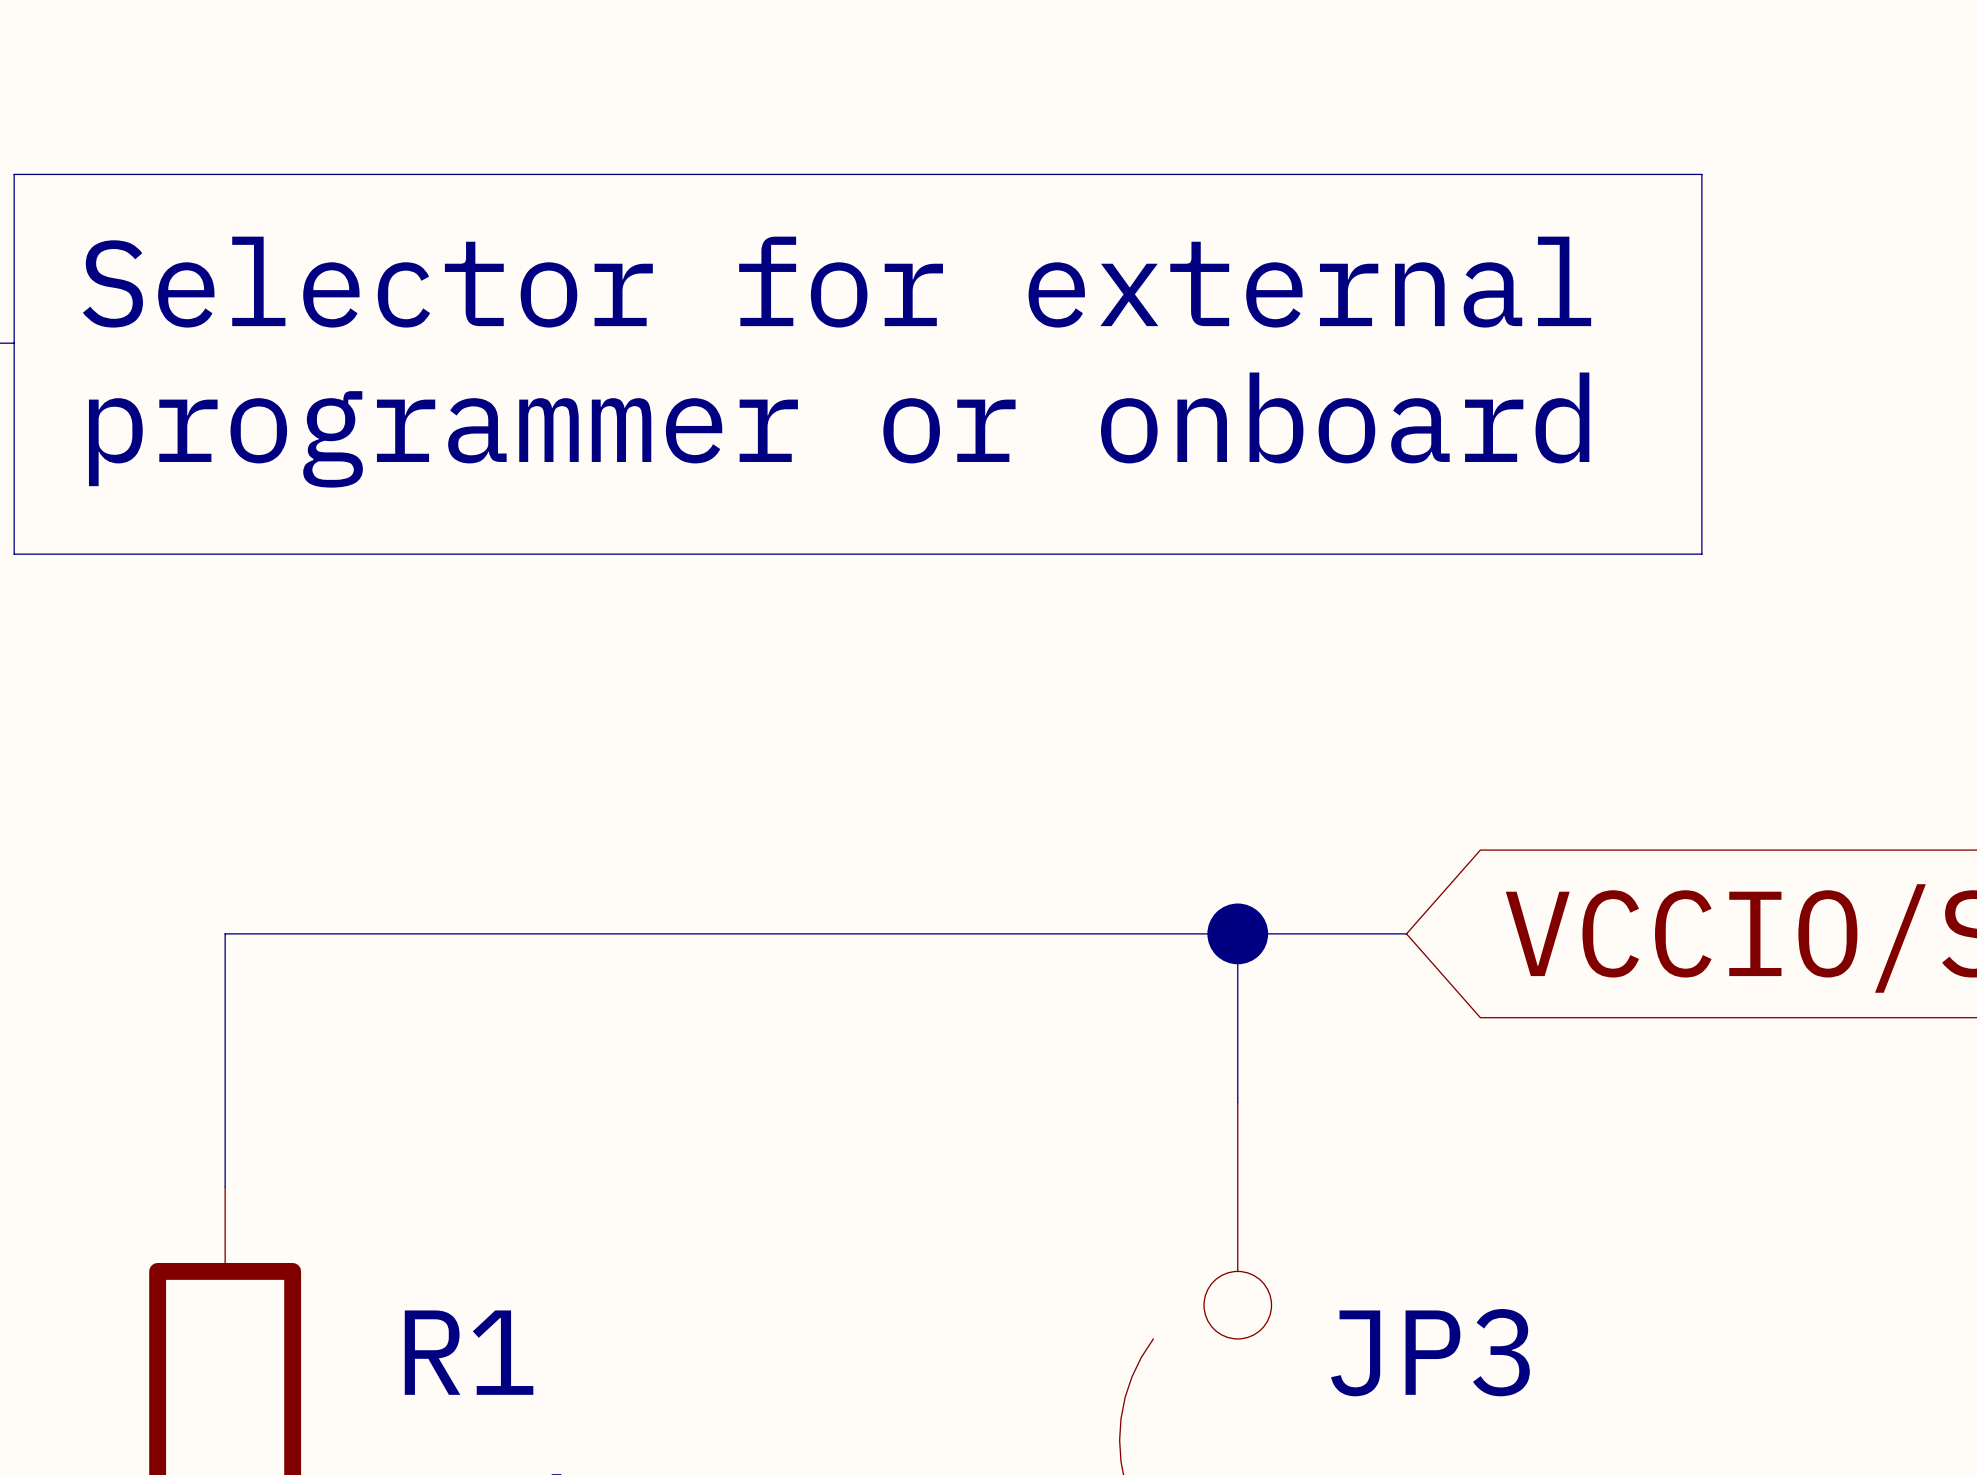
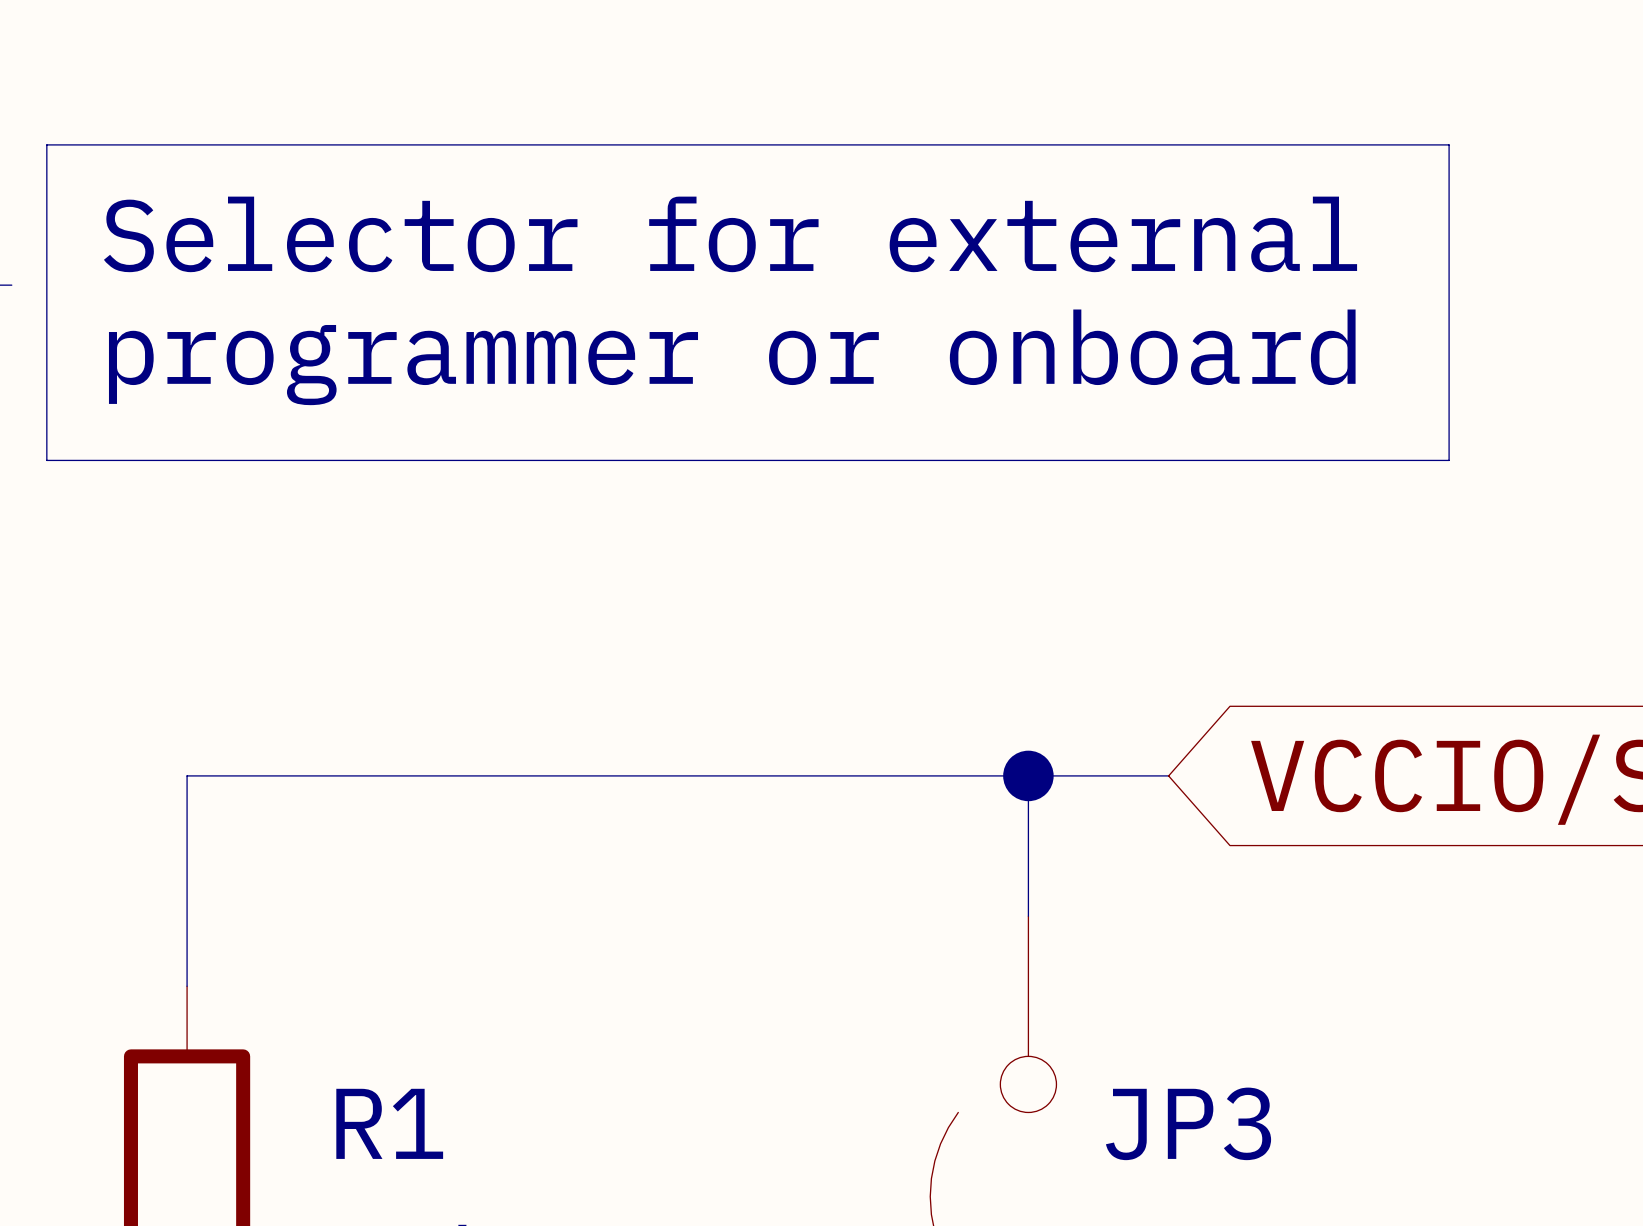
line: (56, 174) (14, 174) (14, 554) (56, 554) -> (46, 144) (46, 460)
line: (1701, 174) (1701, 554) -> (1414, 144) (1449, 144) (1449, 460) (1414, 460)
text position: Selector for external (837, 282) -> Selector for external (730, 234)
text position: programmer or onboard (839, 430) -> programmer or onboard (732, 357)

